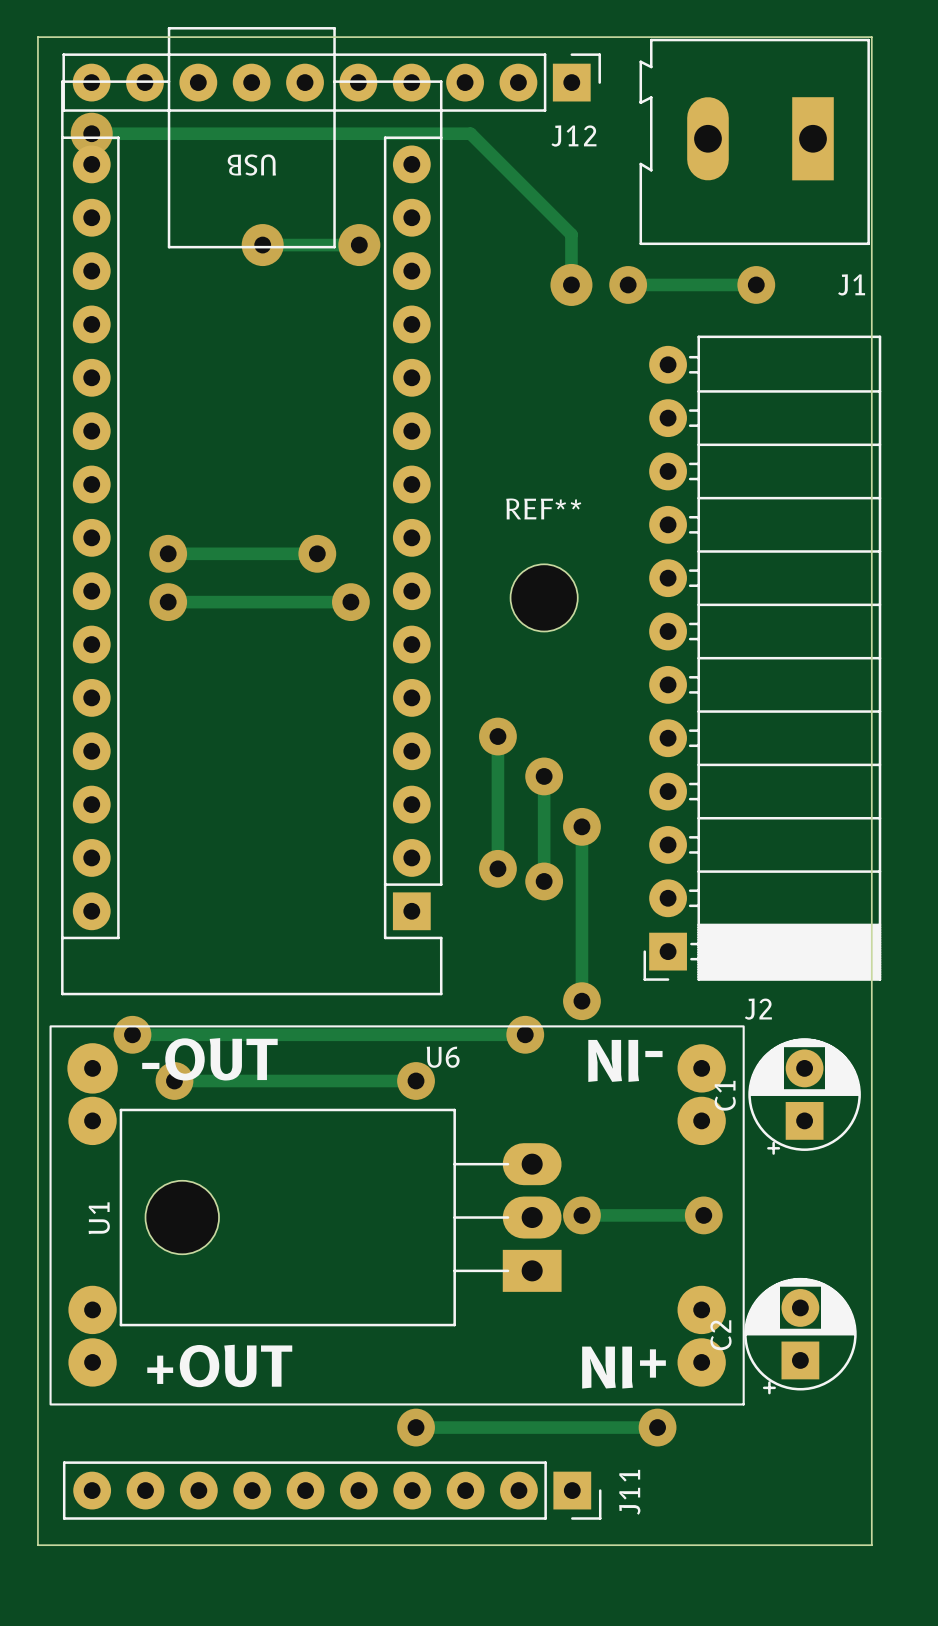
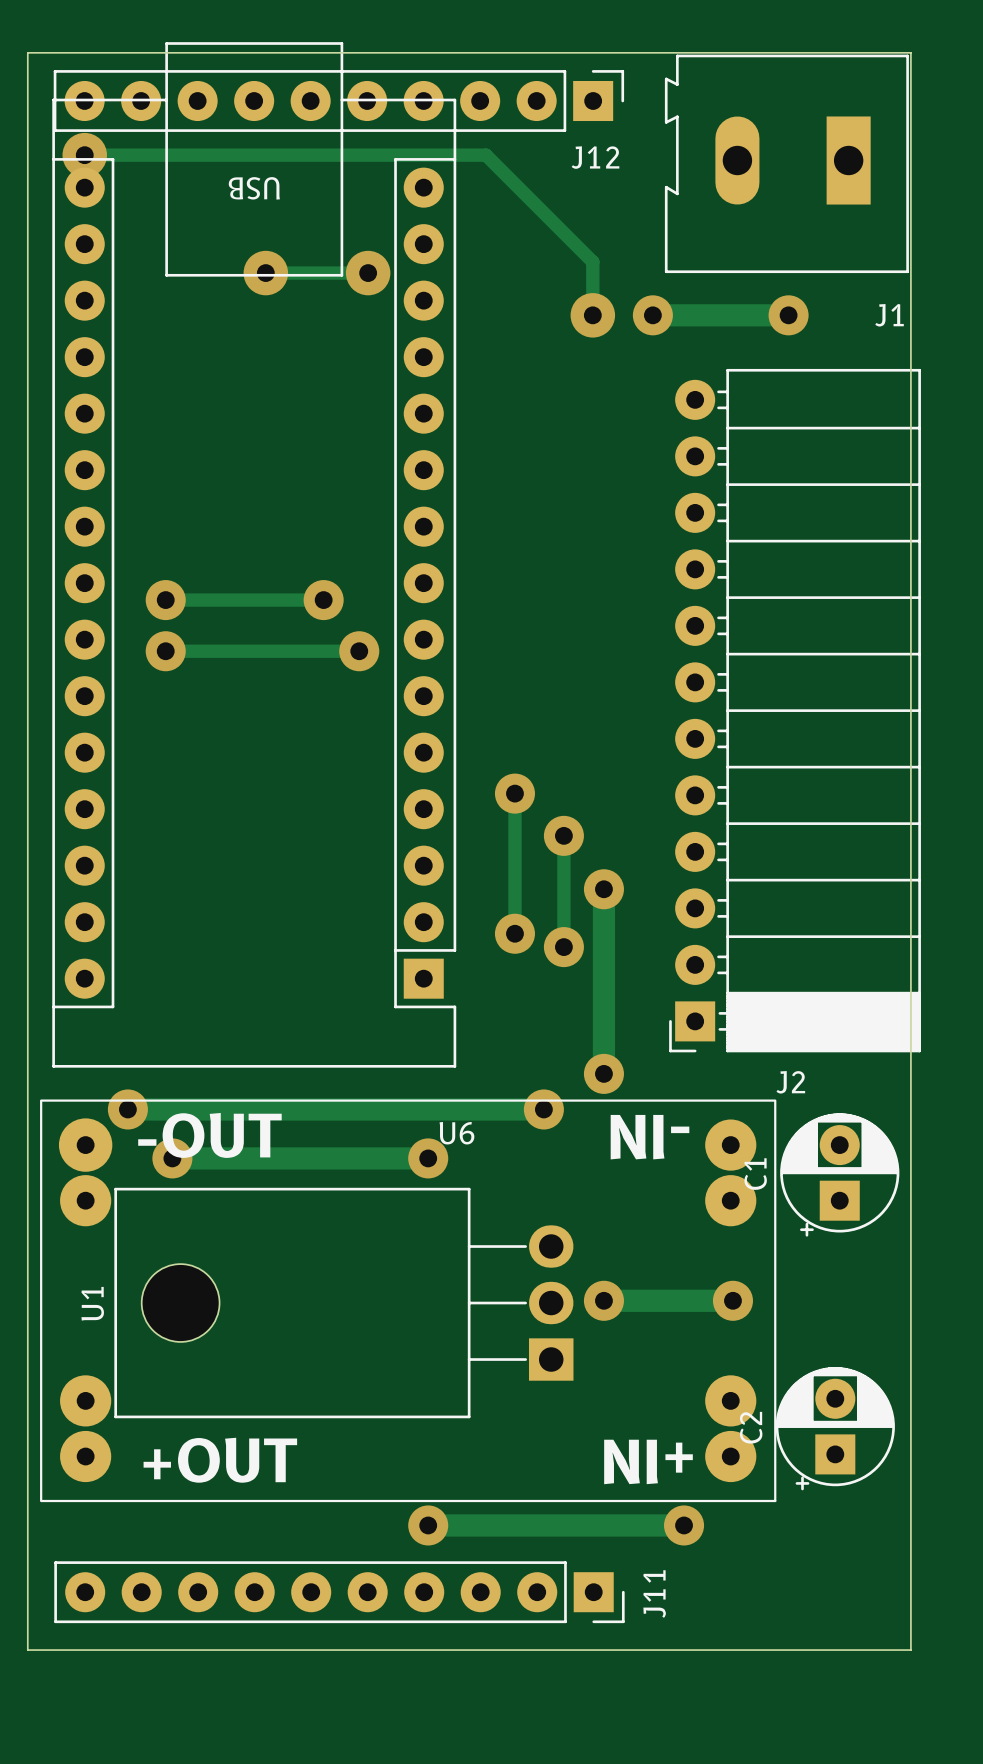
track width: thin (628, 284) (756, 284) -> thick (652, 315) (788, 315)
REF**: (544, 597) -> none
track width: thin (581, 826) (581, 1001) -> thick (603, 889) (603, 1073)
track width: thin (132, 1034) (525, 1034) -> thick (127, 1109) (543, 1109)
track width: thin (174, 1080) (416, 1080) -> thick (172, 1158) (428, 1158)
U1 footprint: [119, 1108, 562, 1327] -> [114, 1187, 574, 1419]
track width: thin (581, 1215) (703, 1215) -> thick (603, 1300) (732, 1300)
track width: thin (416, 1427) (657, 1427) -> thick (428, 1525) (684, 1525)

